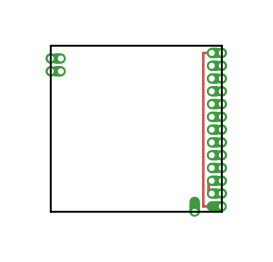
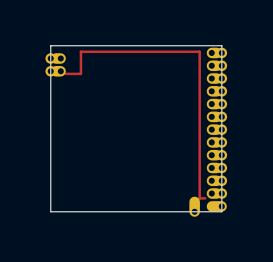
top track: (208, 52) (203, 52) (203, 206) (208, 206) -> none
top track: none -> (65, 73) (80, 73) (80, 51) (199, 51) (199, 198) (205, 198)
top track: (208, 180) (208, 193) -> none

